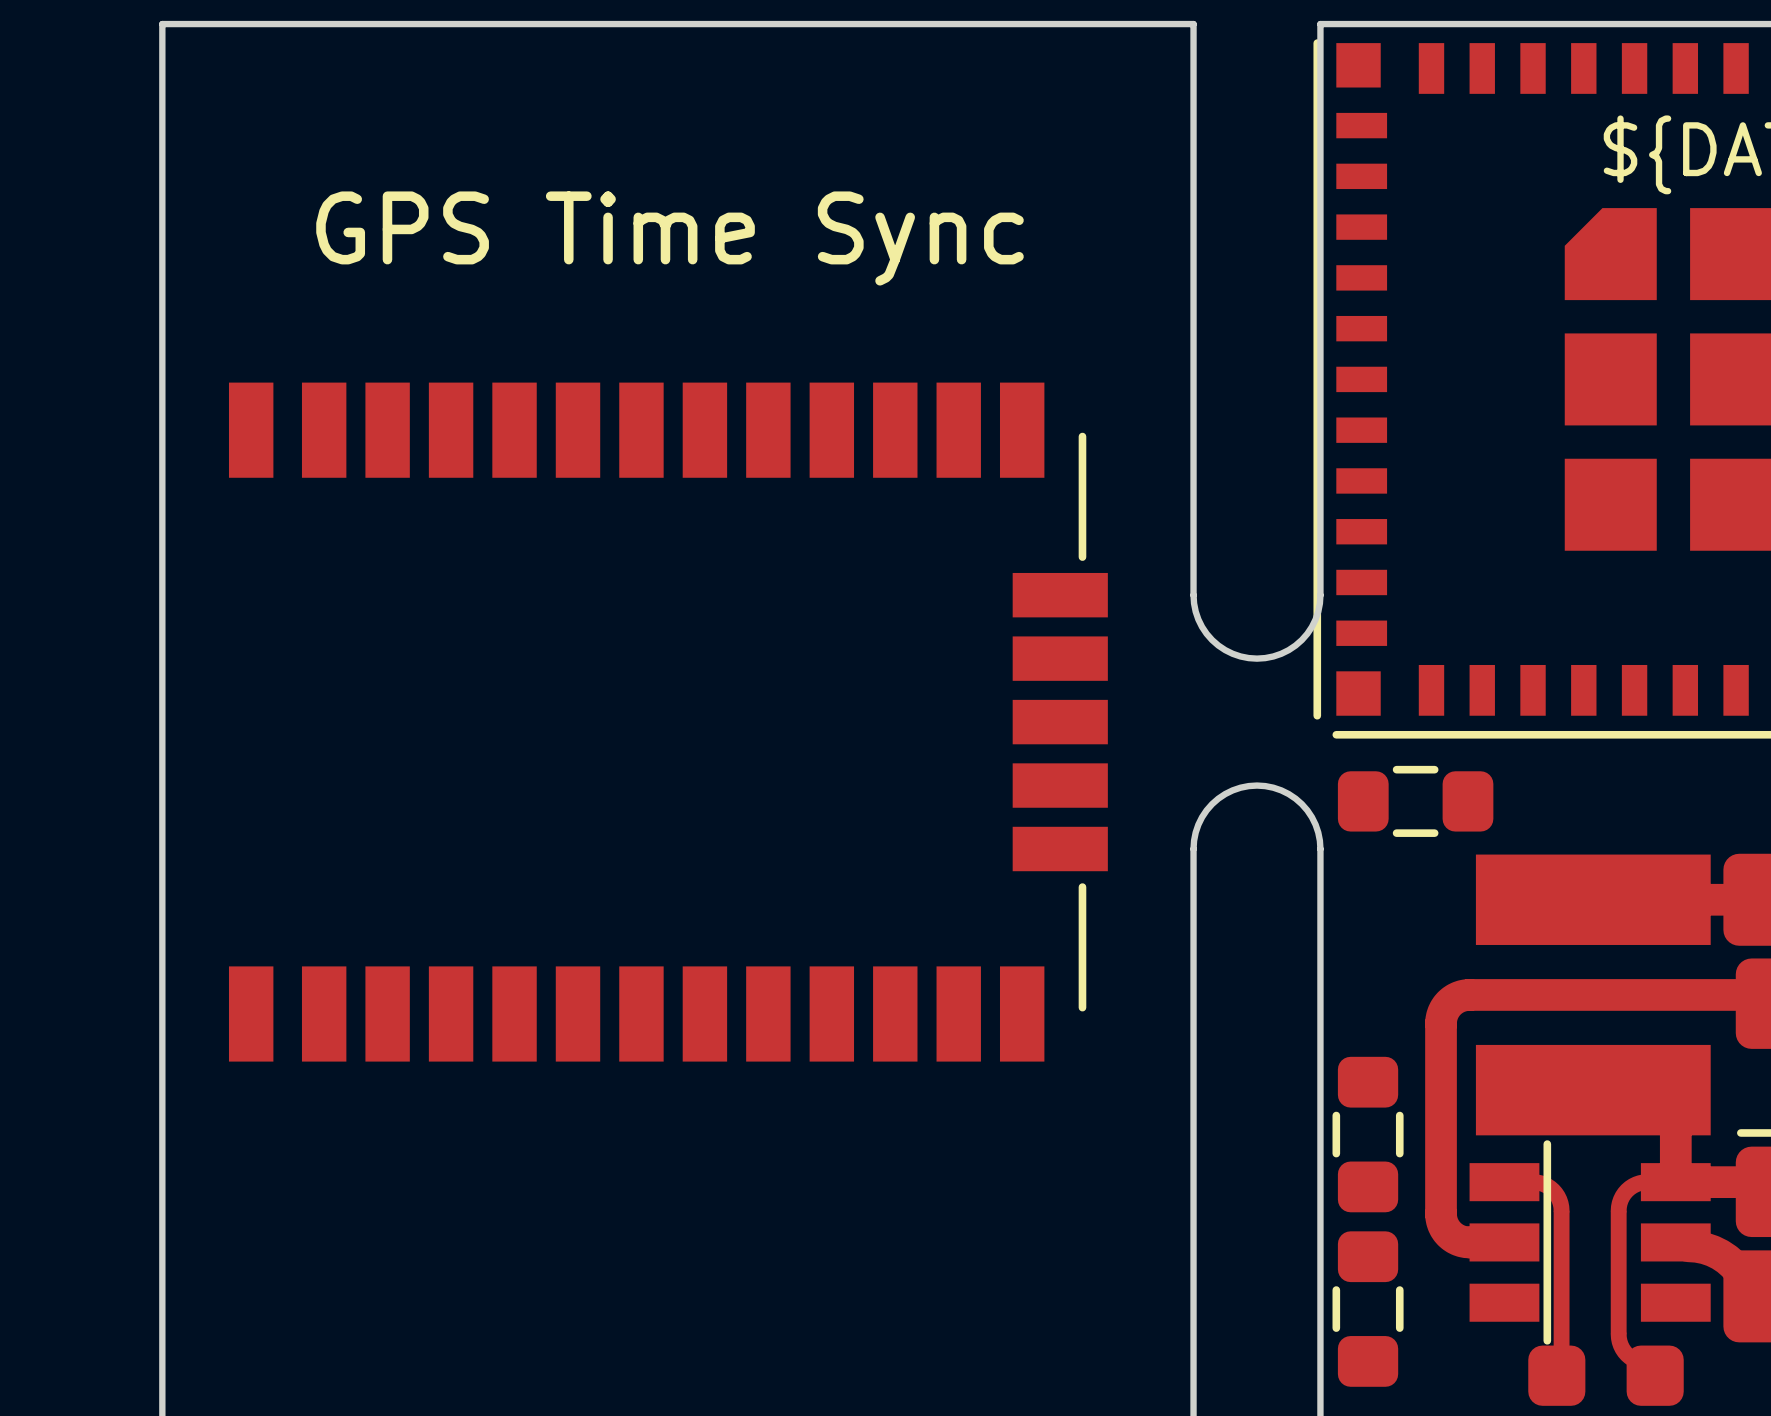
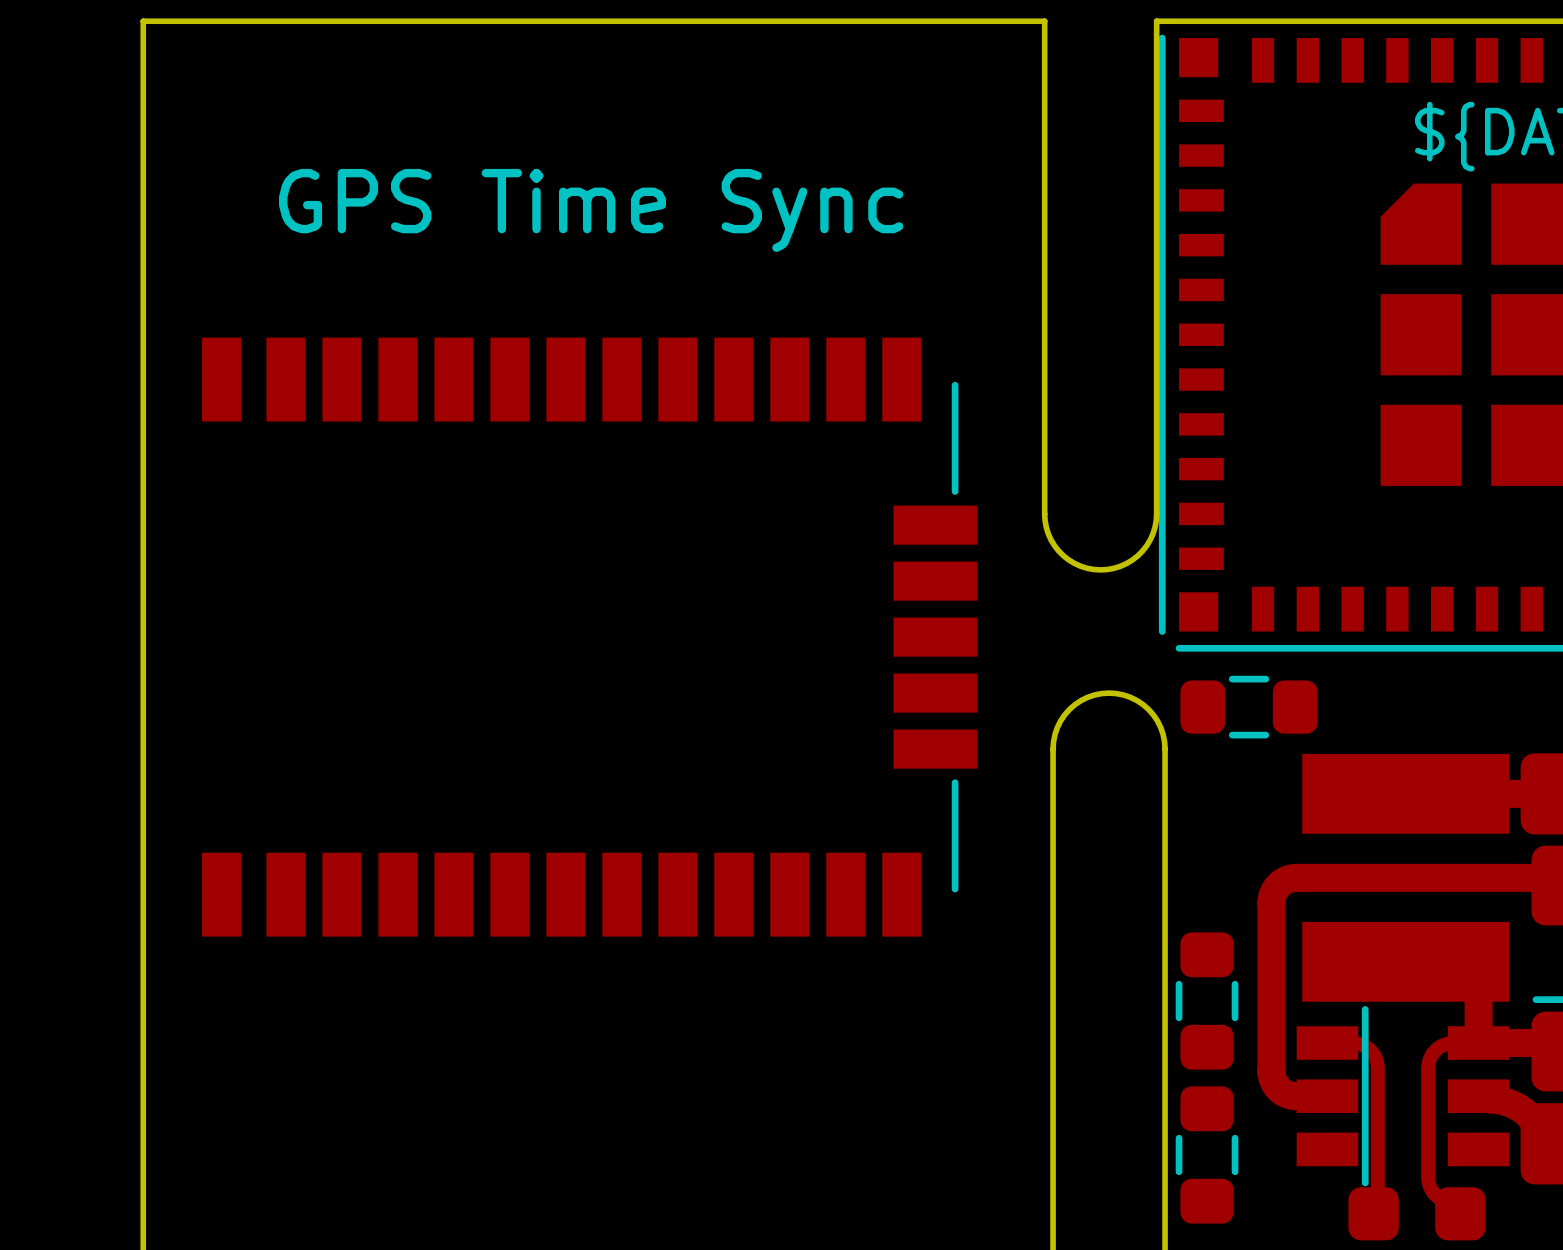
board edge: (1184, 24) (1193, 24) (1194, 603) (1198, 619) (1212, 640) (1232, 653) (1256, 658) (1281, 653) (1301, 640) (1315, 619) (1319, 603) (1320, 24) -> (1044, 21) (1045, 520) (1051, 539) (1063, 555) (1080, 566) (1100, 569) (1120, 566) (1137, 555) (1150, 539) (1156, 520) (1156, 21) (1165, 21)

